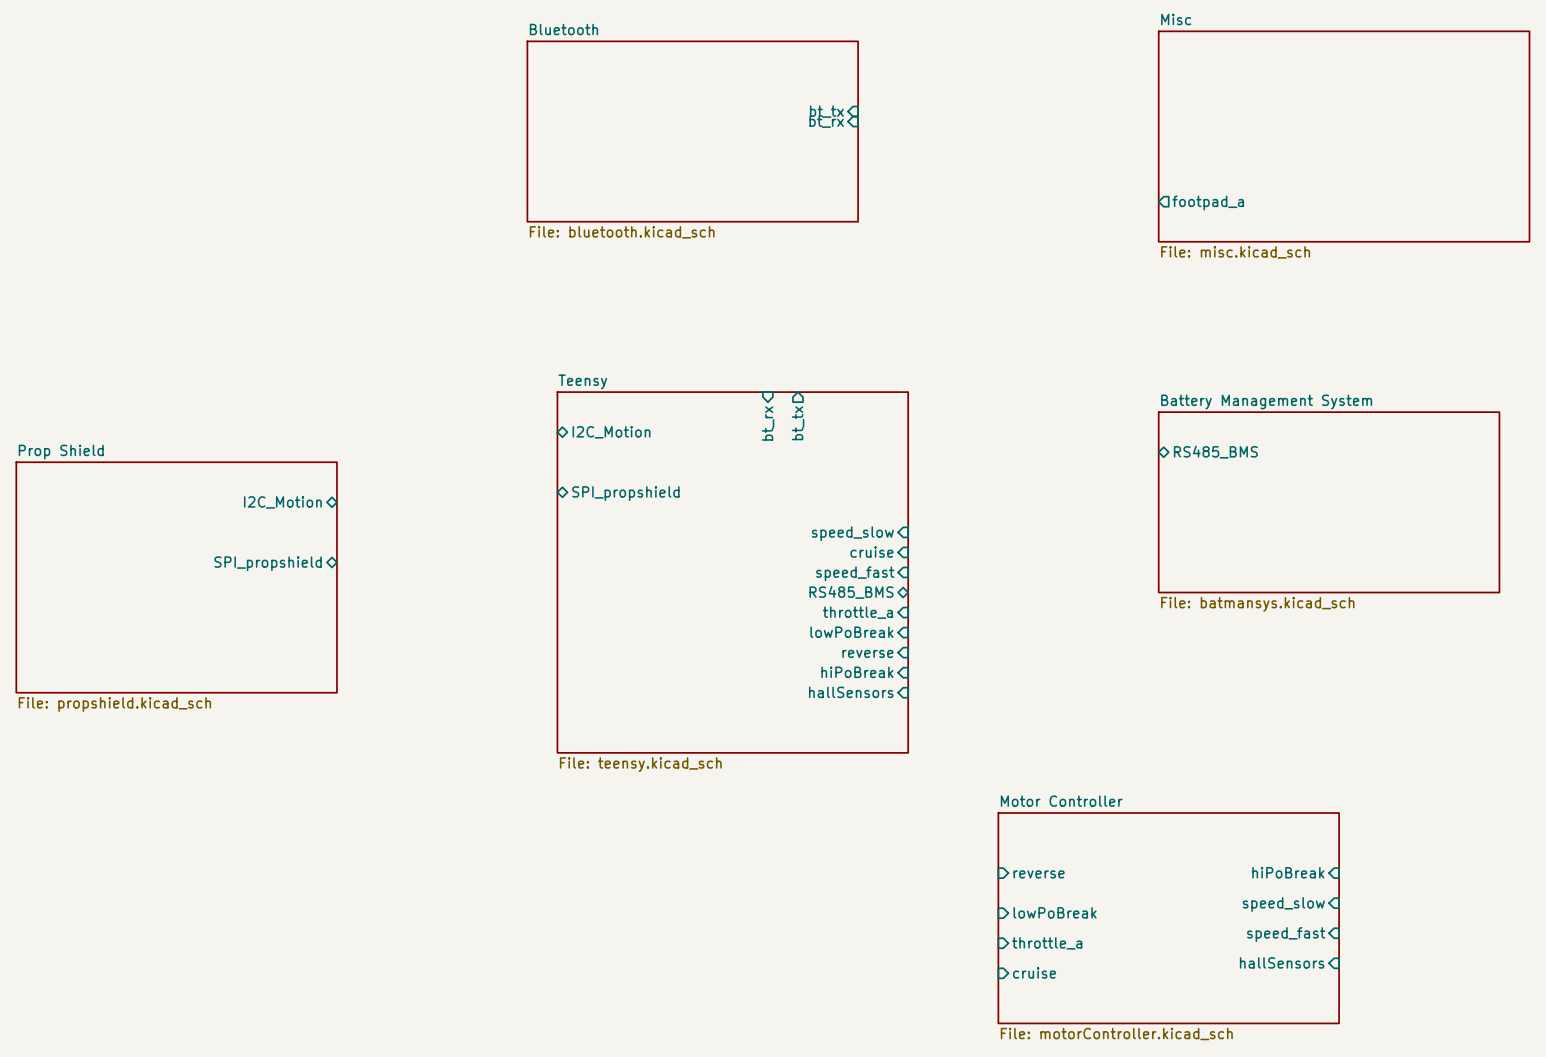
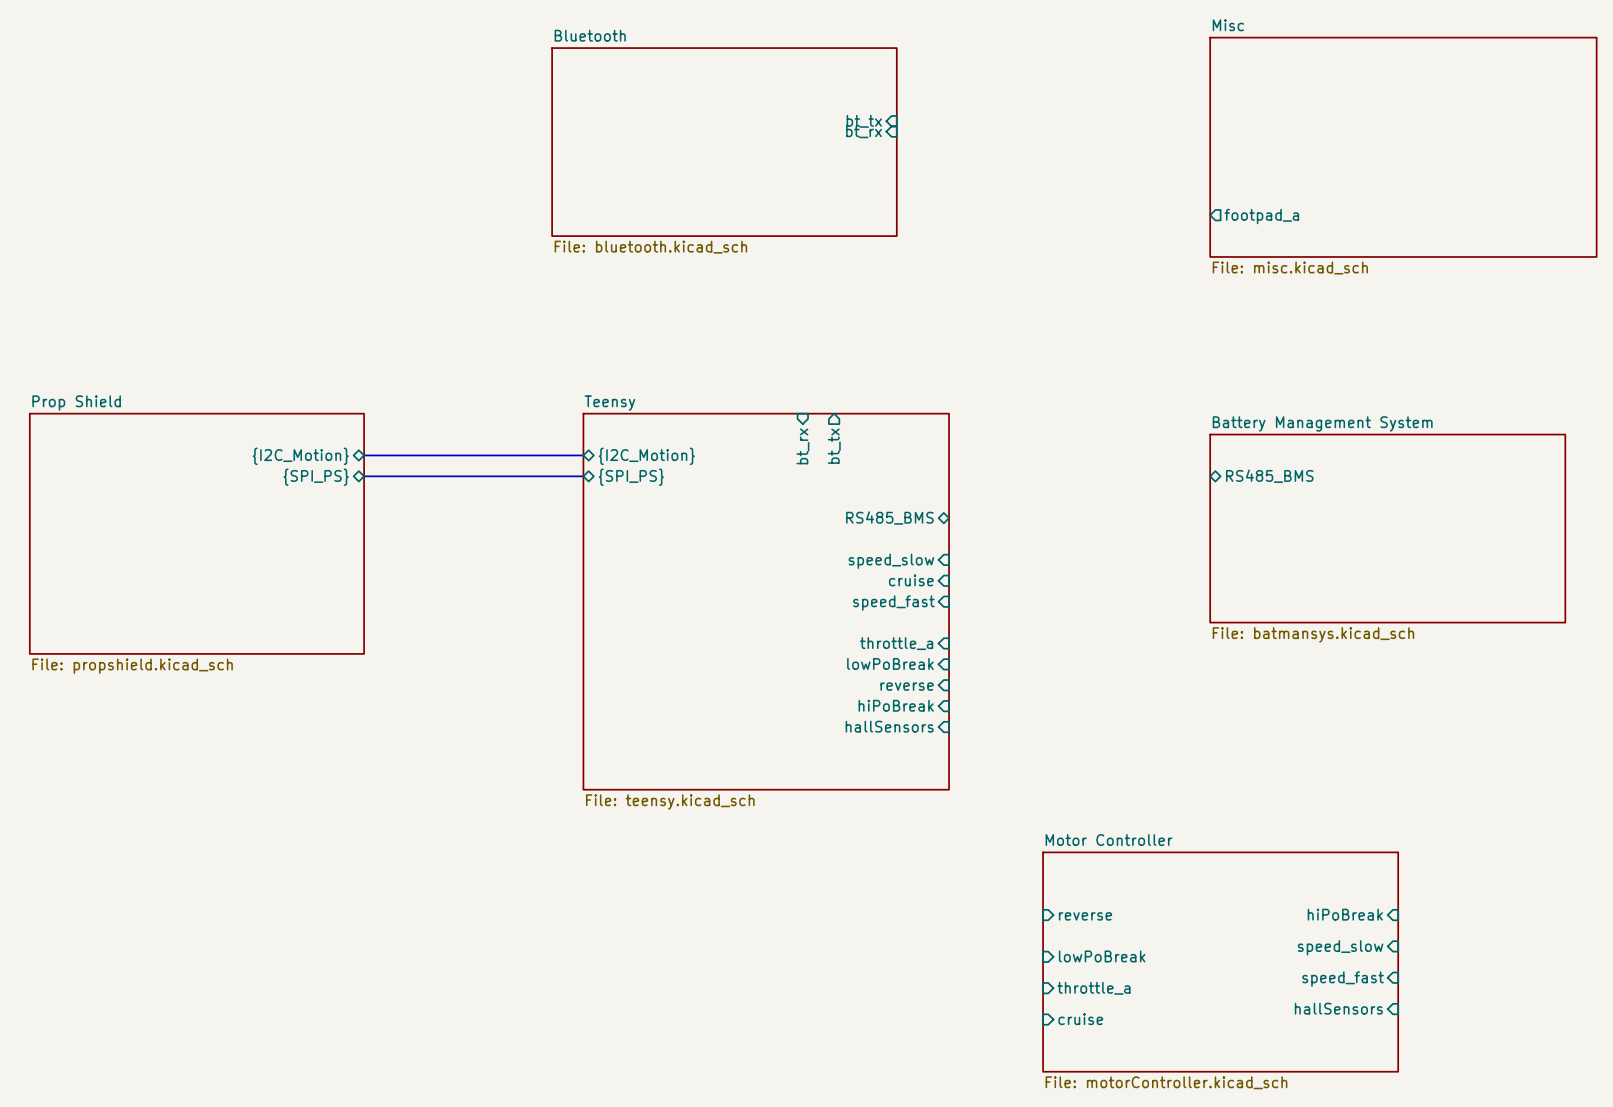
bus: none -> (364, 455) (583, 455)
sheet pin: I2C_Motion (611, 432) -> {I2C_Motion} (646, 456)
sheet pin: none -> {I2C_Motion} (300, 456)
bus: none -> (364, 476) (583, 476)
sheet pin: none -> {SPI_PS} (316, 477)
sheet pin: none -> {SPI_PS} (631, 477)
sheet pin: SPI_propshield (625, 493) -> none
sheet pin: I2C_Motion (282, 502) -> none
sheet pin: SPI_propshield (268, 563) -> none
sheet Prop Shield position: (176, 577) -> (196, 533)
sheet pin position: RS485_BMS (851, 592) -> RS485_BMS (889, 517)

